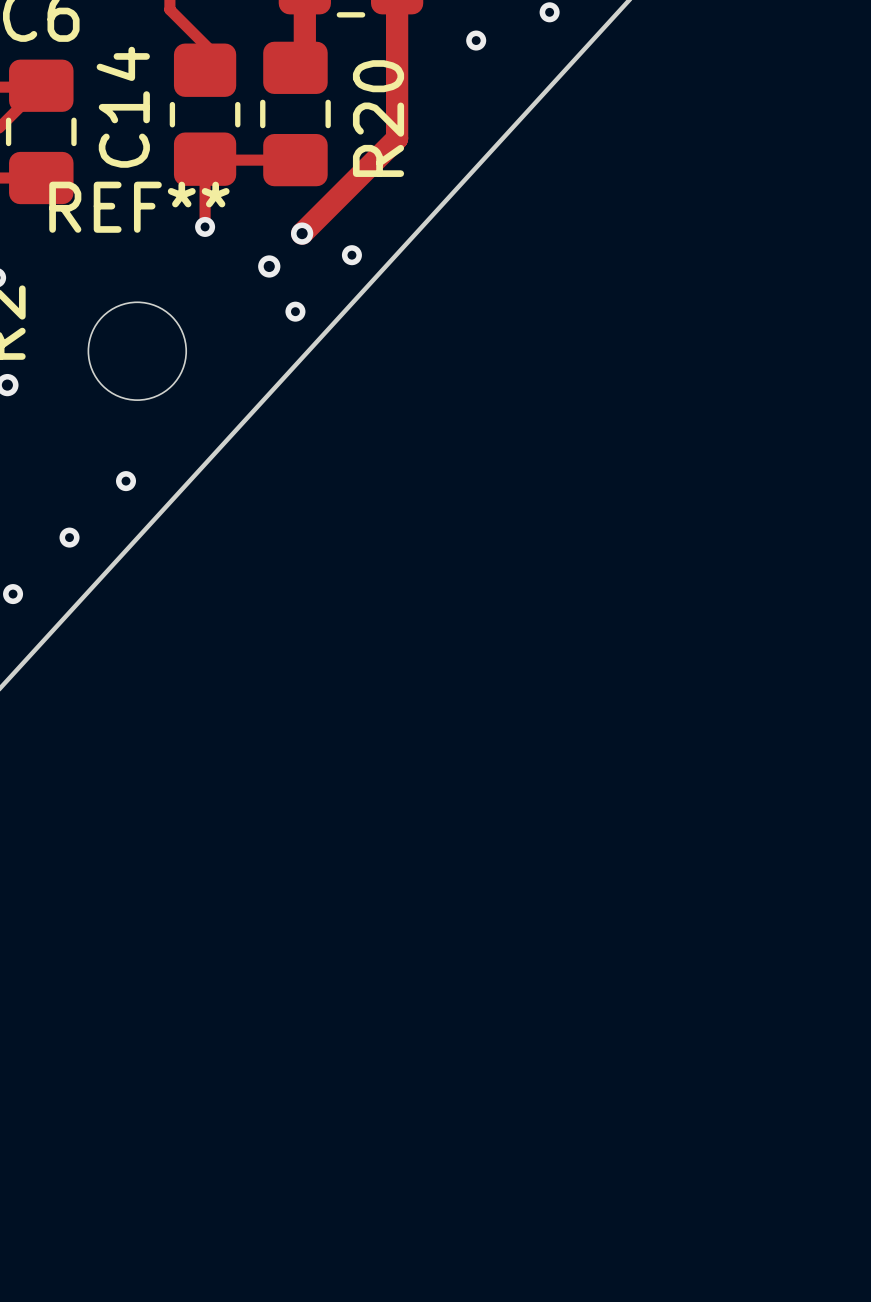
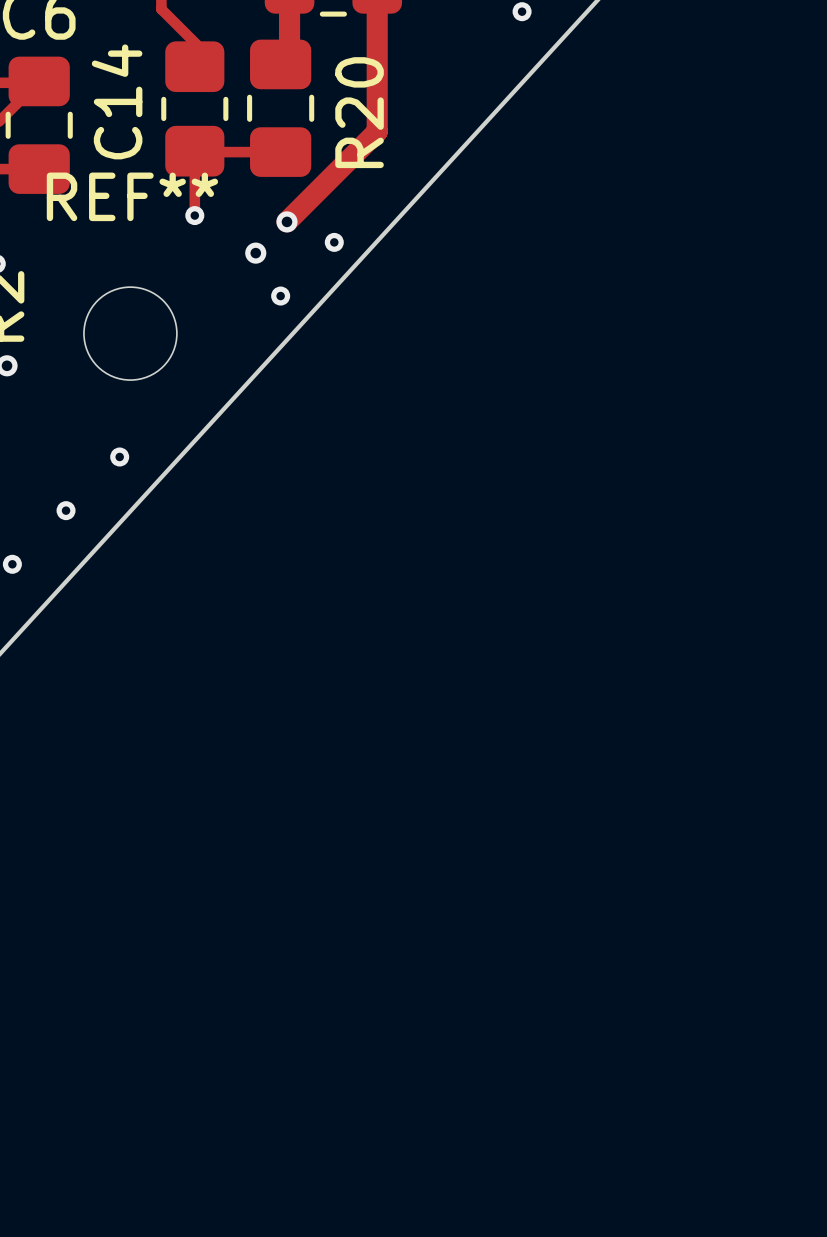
via: (476, 40) -> none

